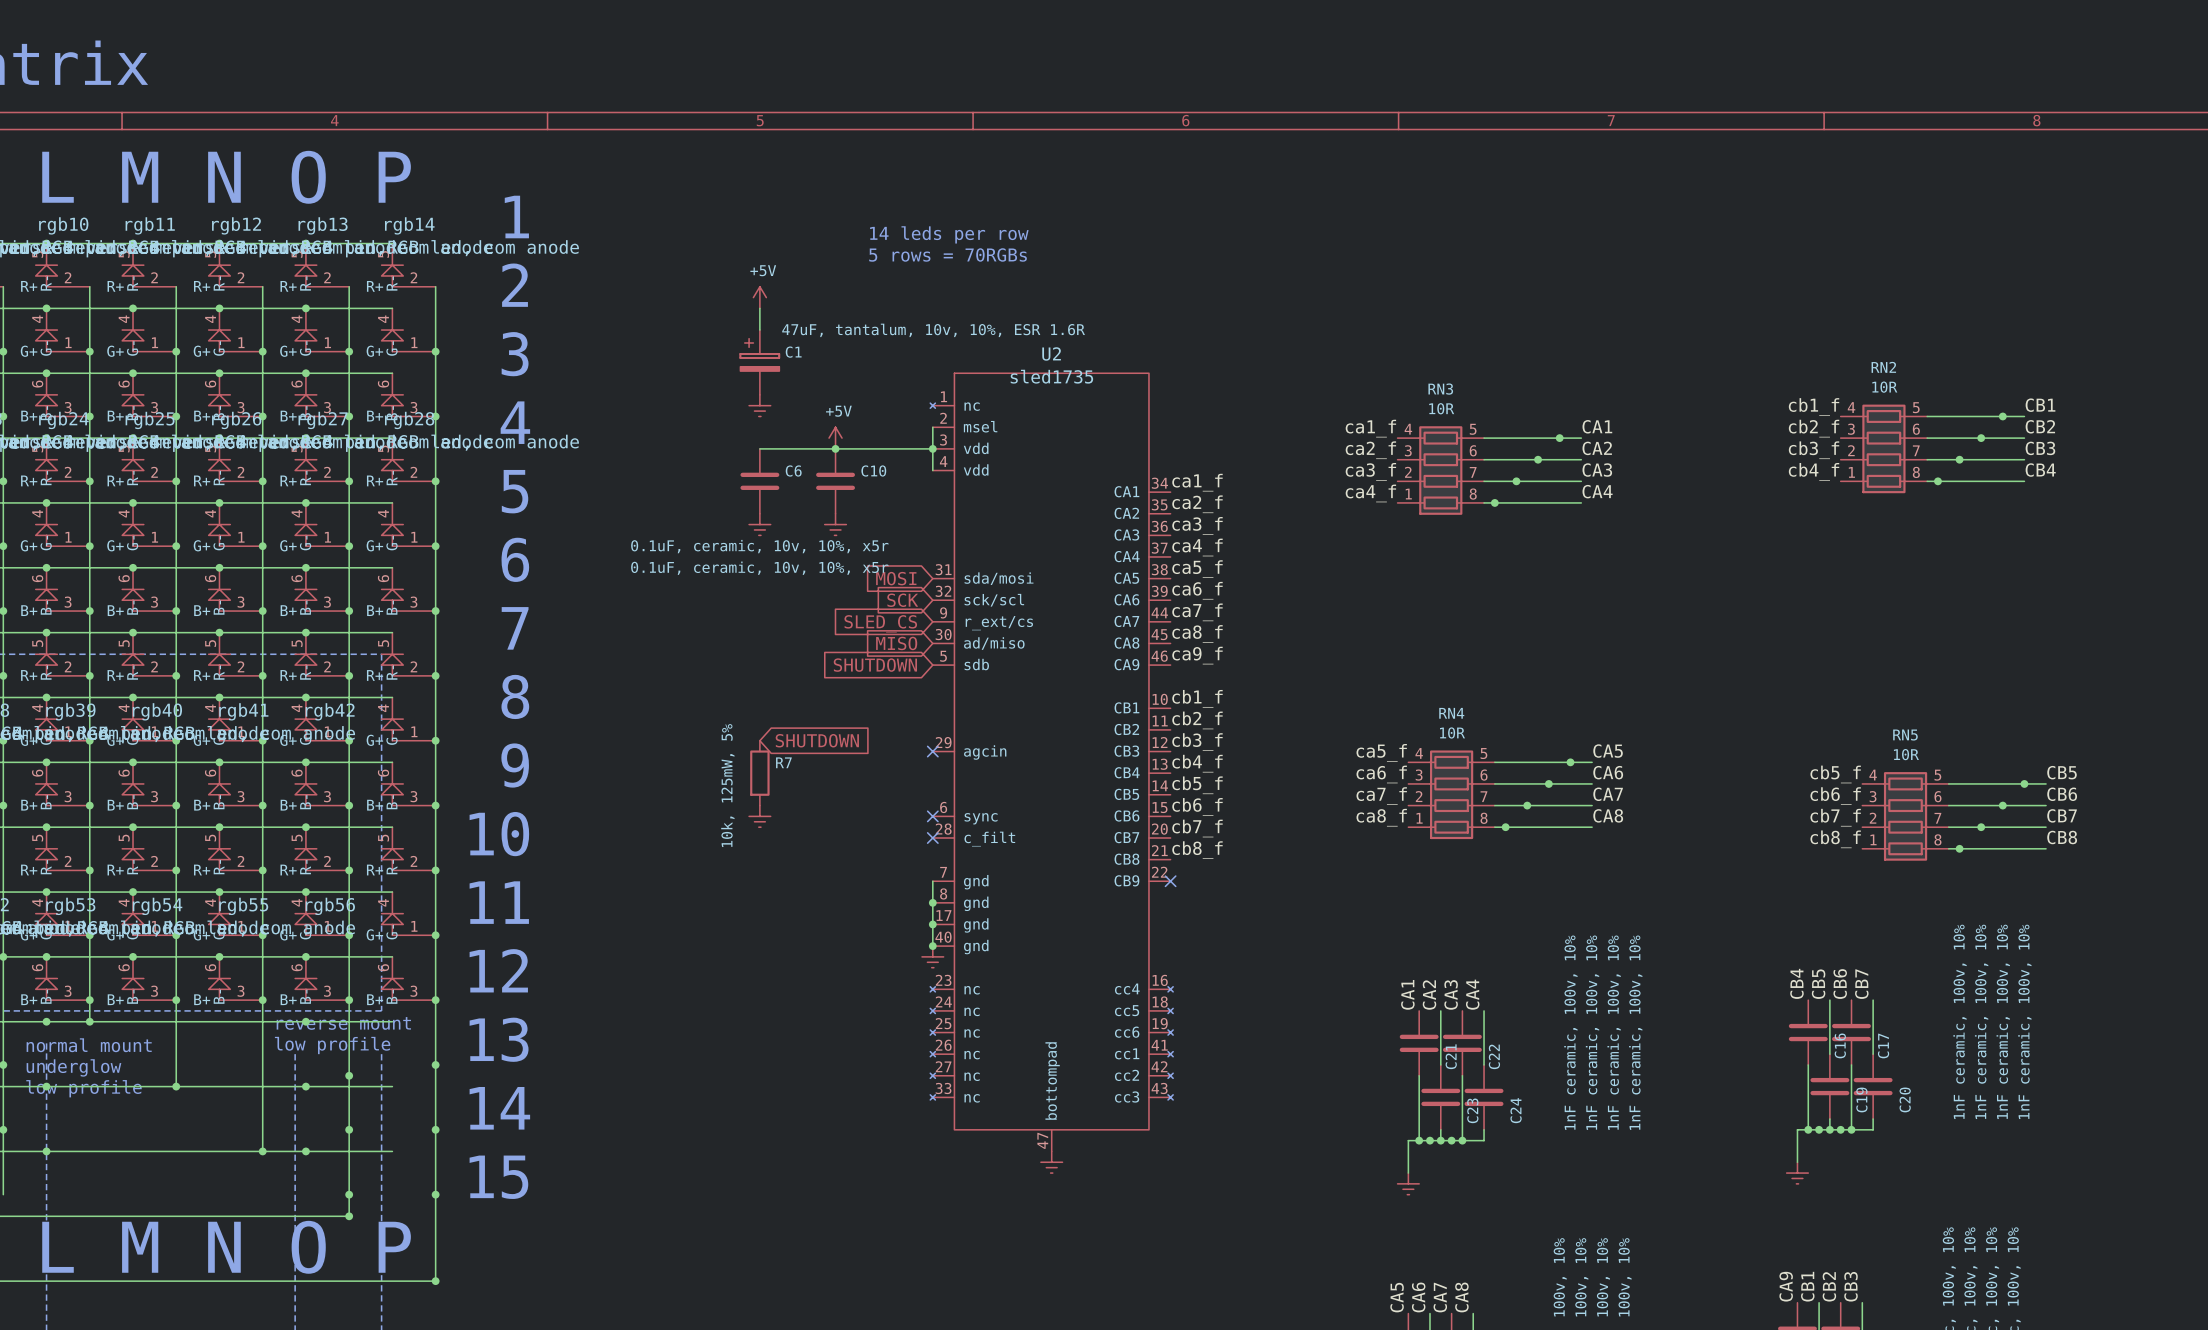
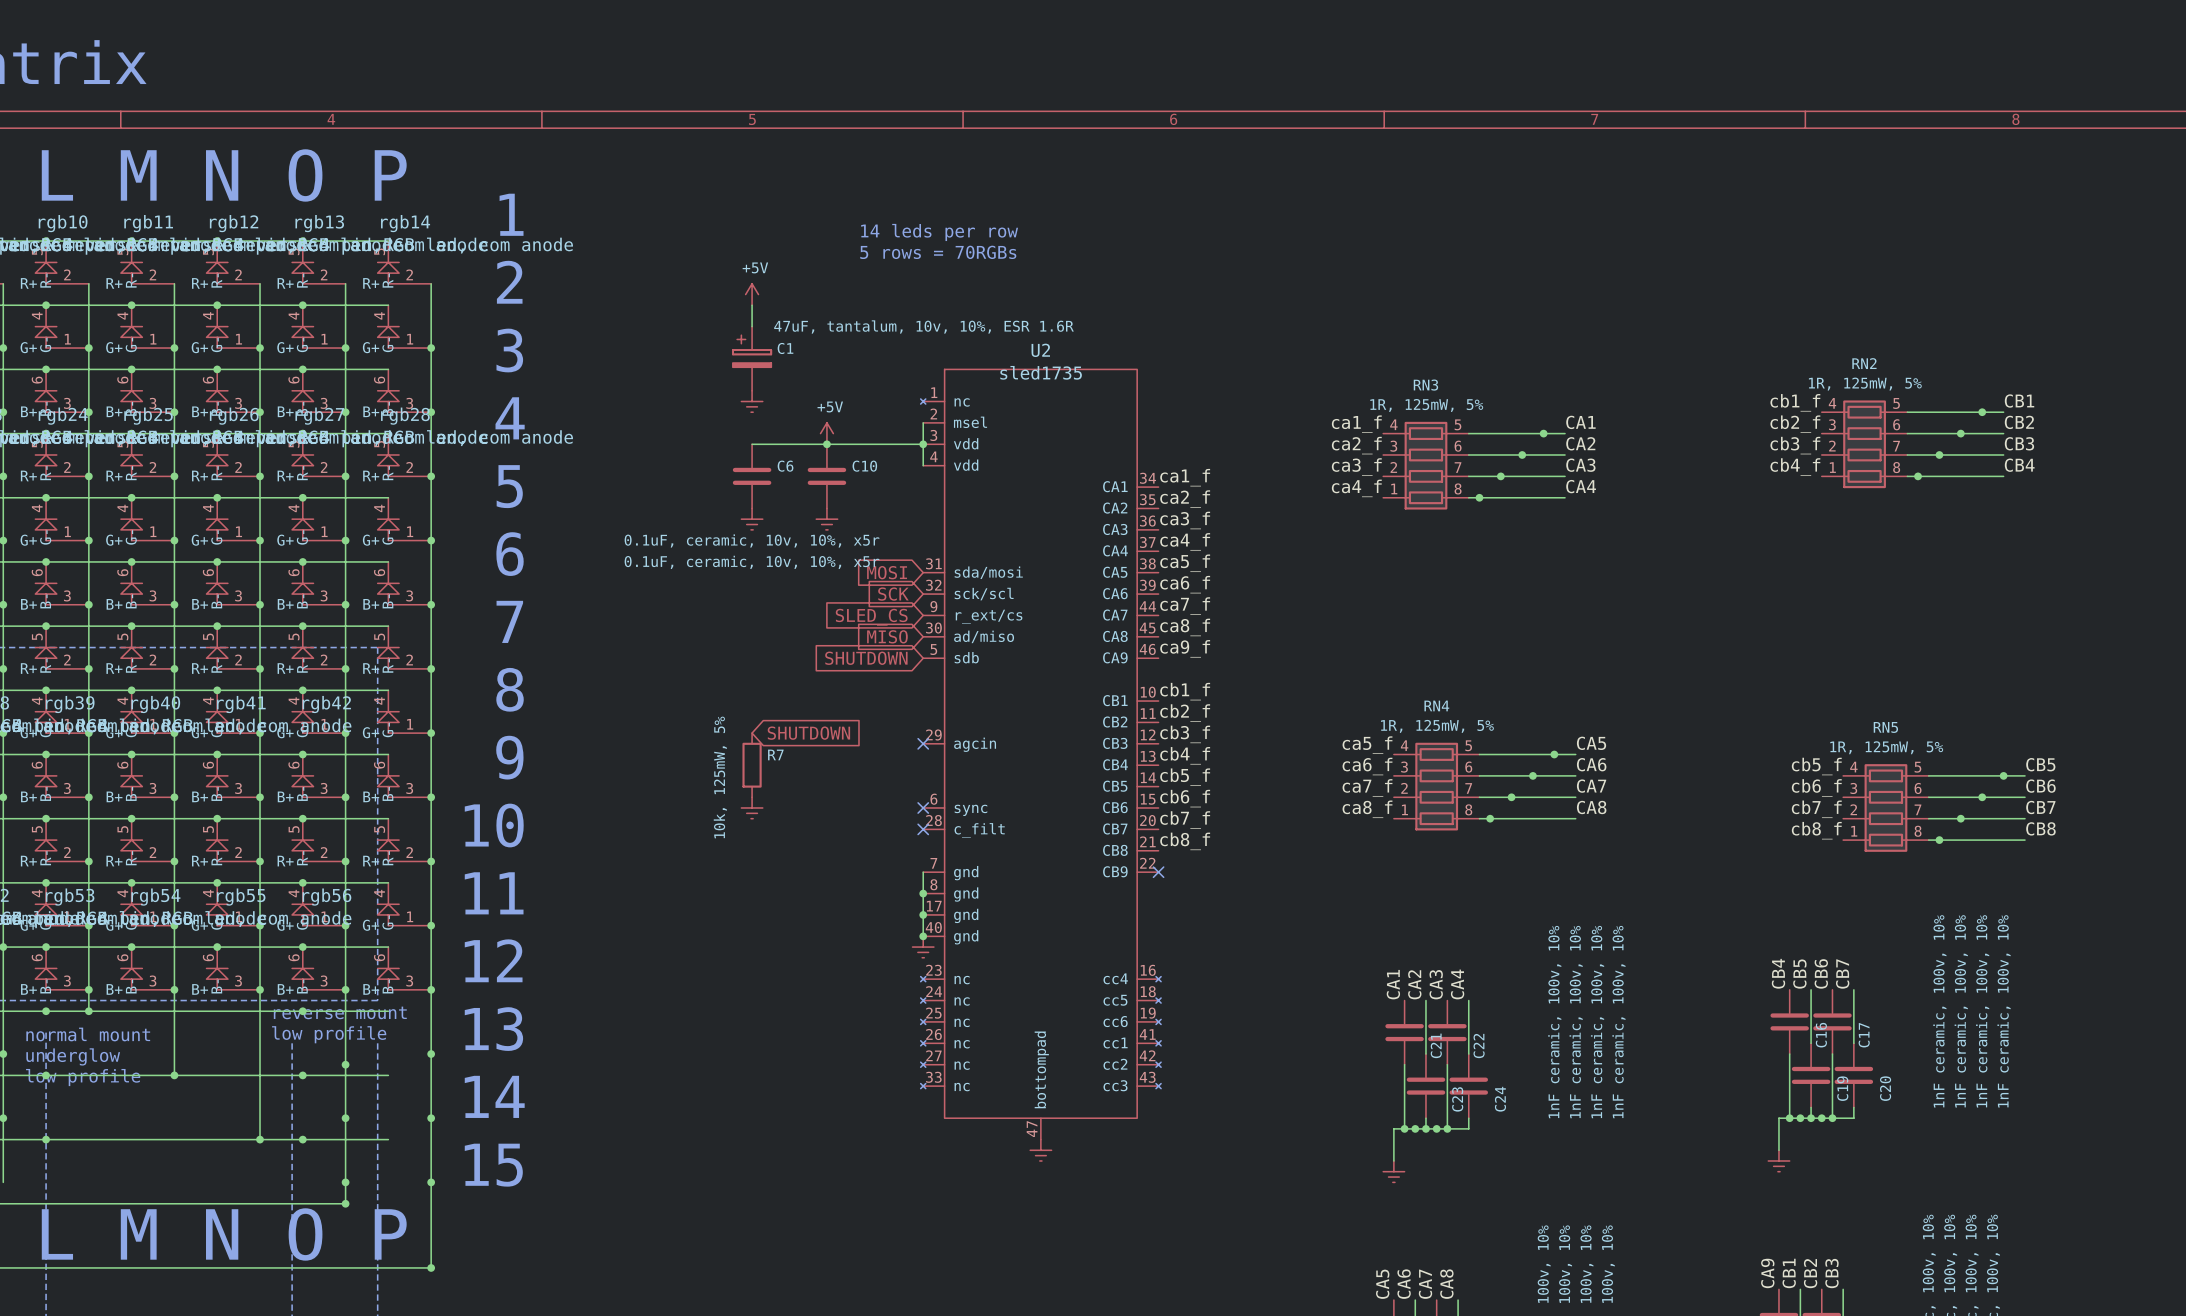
RN2 value: 10R (1884, 387) -> 1R, 125mW, 5% (1865, 384)
RN3 value: 10R (1441, 408) -> 1R, 125mW, 5% (1426, 405)
RN4 value: 10R (1452, 732) -> 1R, 125mW, 5% (1437, 726)
RN5 value: 10R (1906, 754) -> 1R, 125mW, 5% (1886, 747)

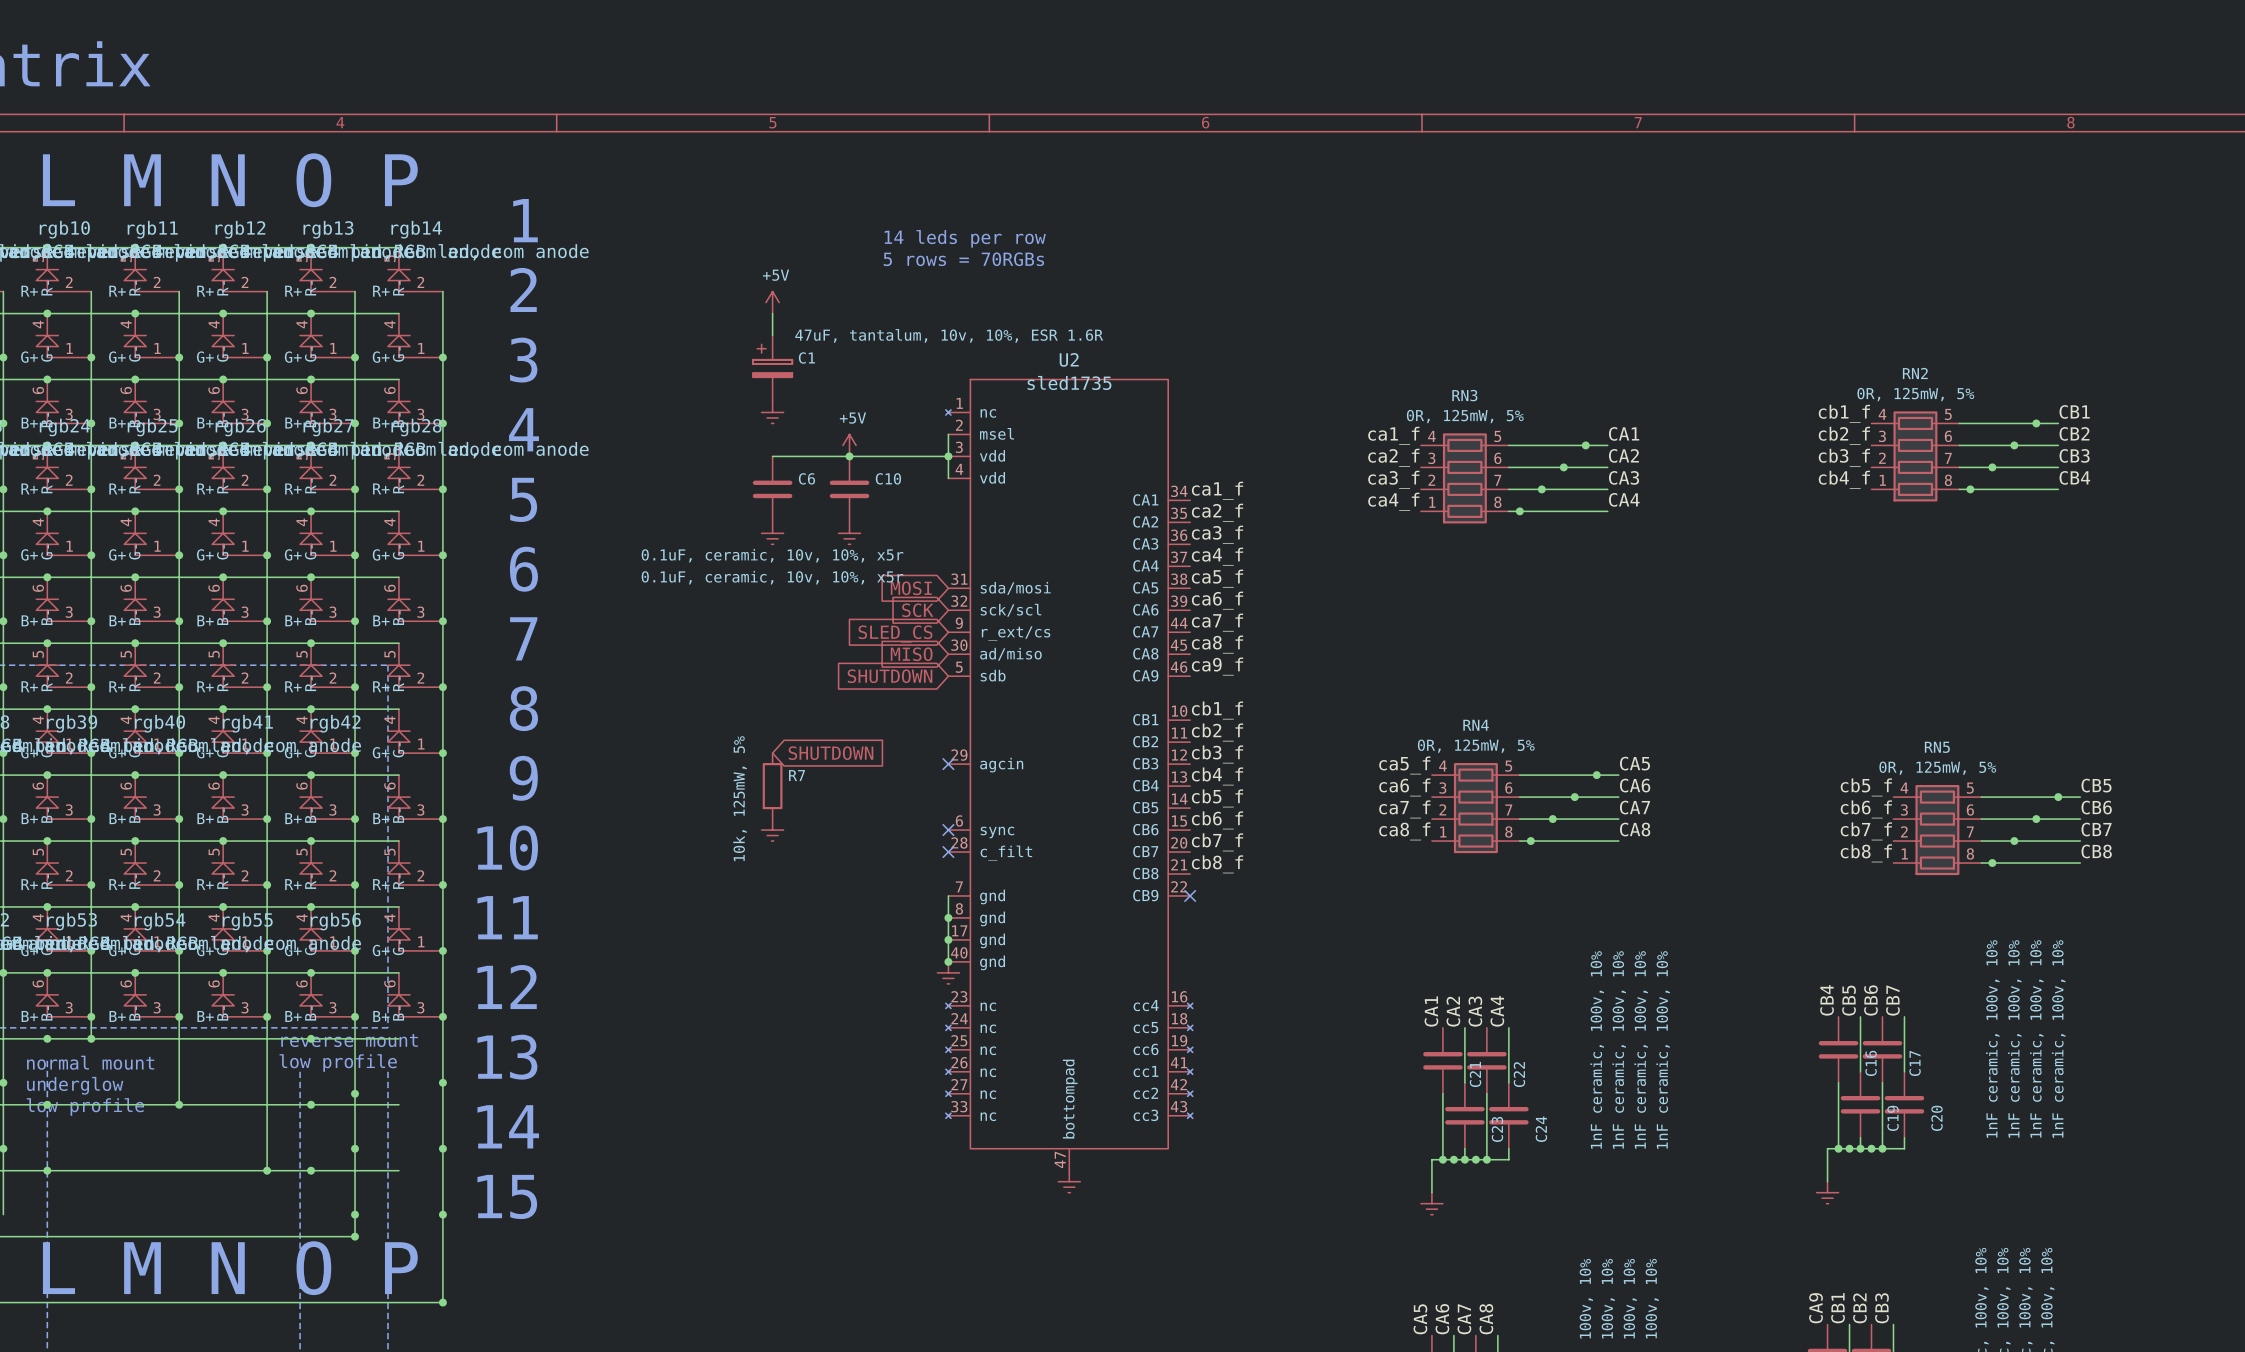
RN2 value: 1R, 125mW, 5% (1865, 384) -> 0R, 125mW, 5% (1915, 394)
RN3 value: 1R, 125mW, 5% (1426, 405) -> 0R, 125mW, 5% (1465, 416)
RN4 value: 1R, 125mW, 5% (1437, 726) -> 0R, 125mW, 5% (1476, 746)
RN5 value: 1R, 125mW, 5% (1886, 747) -> 0R, 125mW, 5% (1937, 768)

